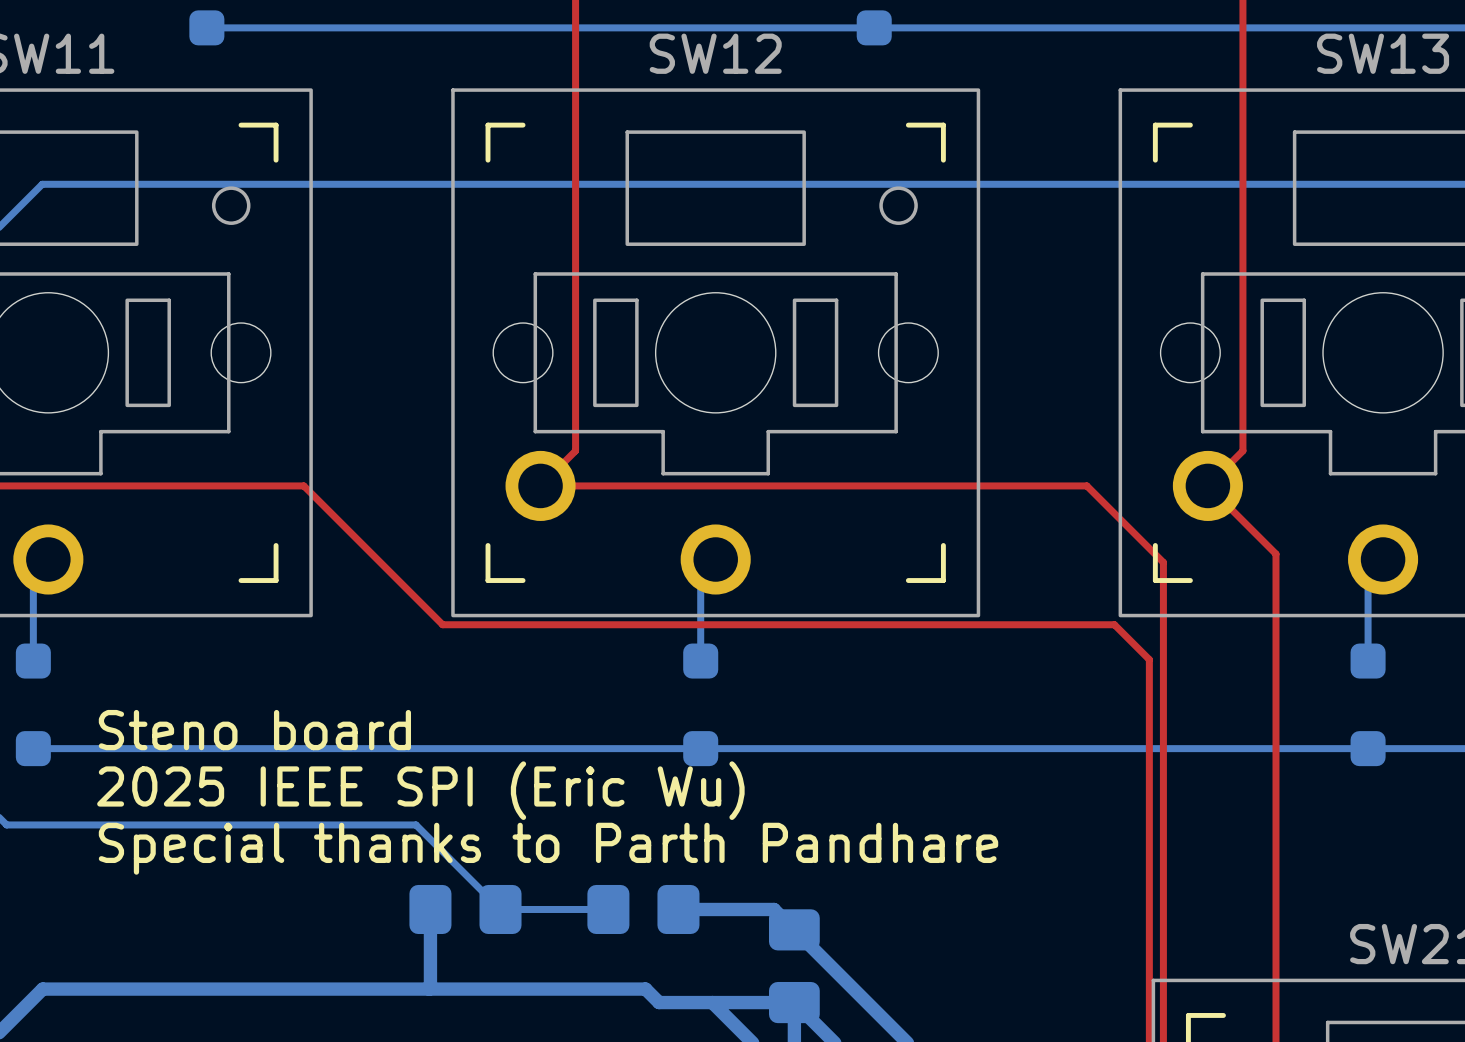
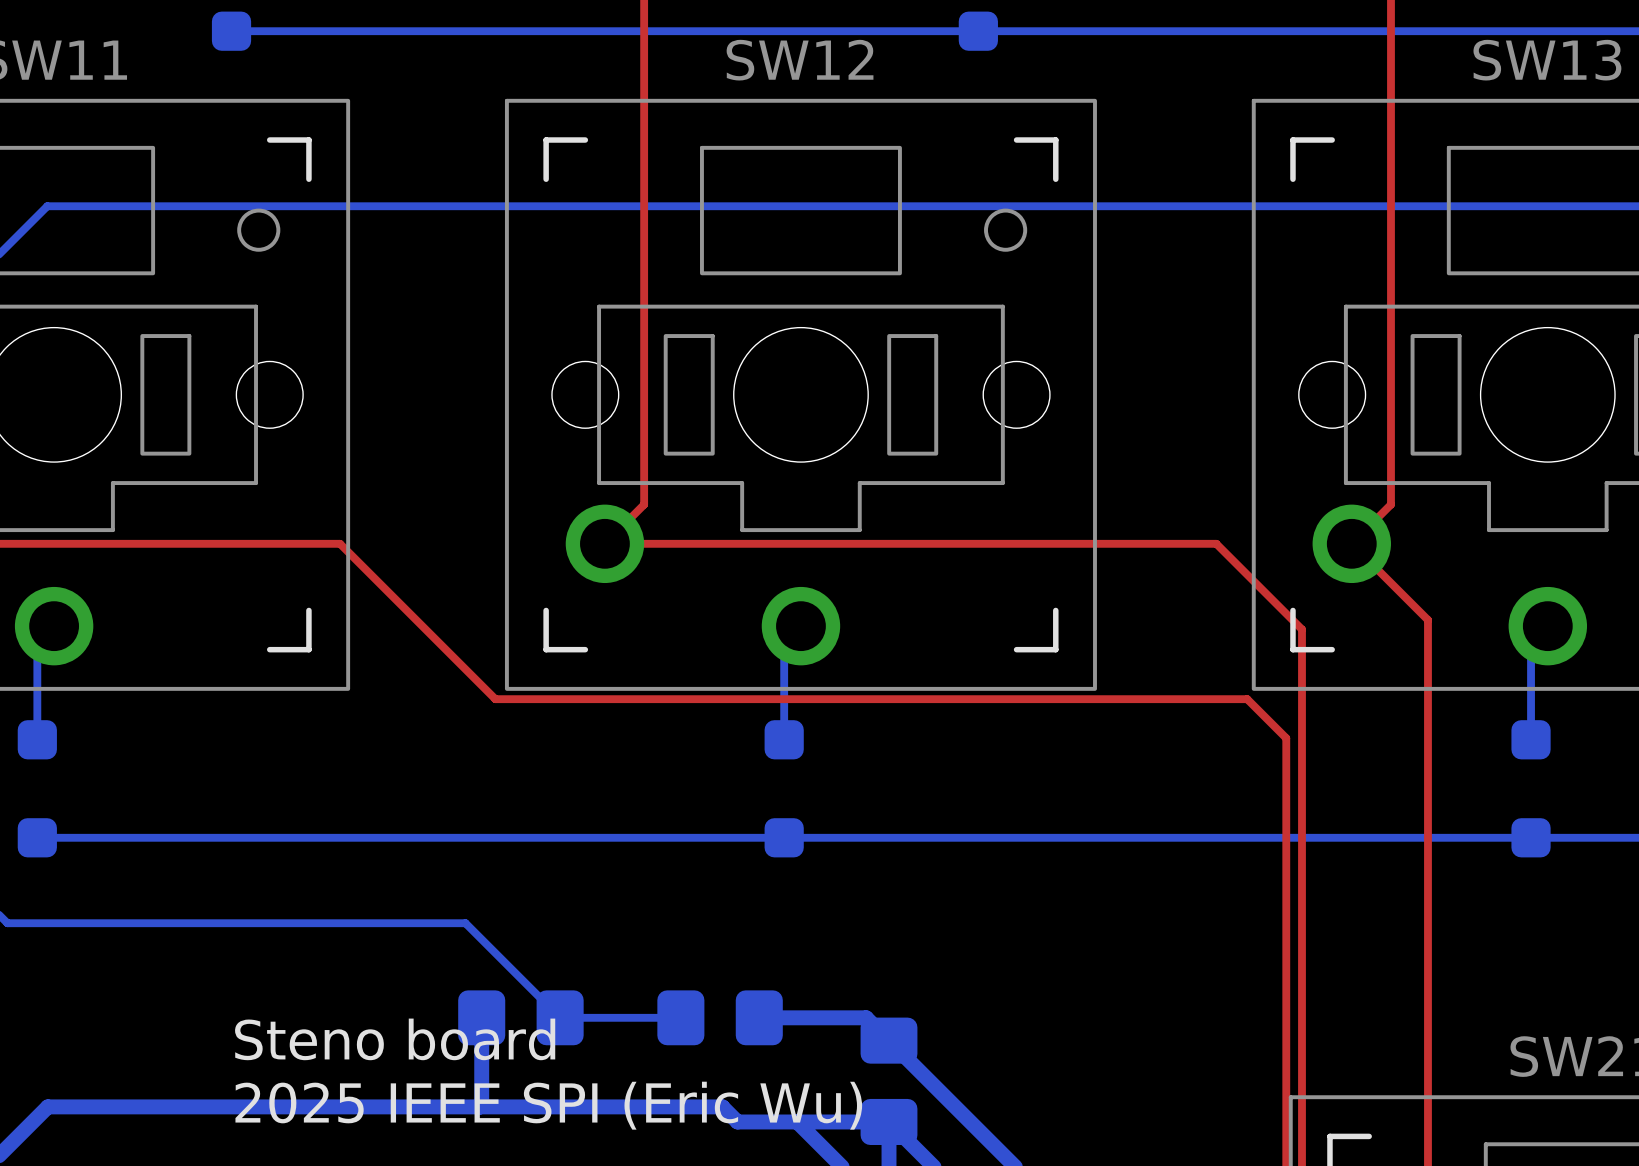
text position: Steno board (254, 730) -> Steno board (395, 1039)
text position: 2025 IEEE SPI (Eric Wu) (420, 790) -> 2025 IEEE SPI (Eric Wu) (548, 1105)
text: Special thanks to Parth Pandhare (548, 848) -> none

